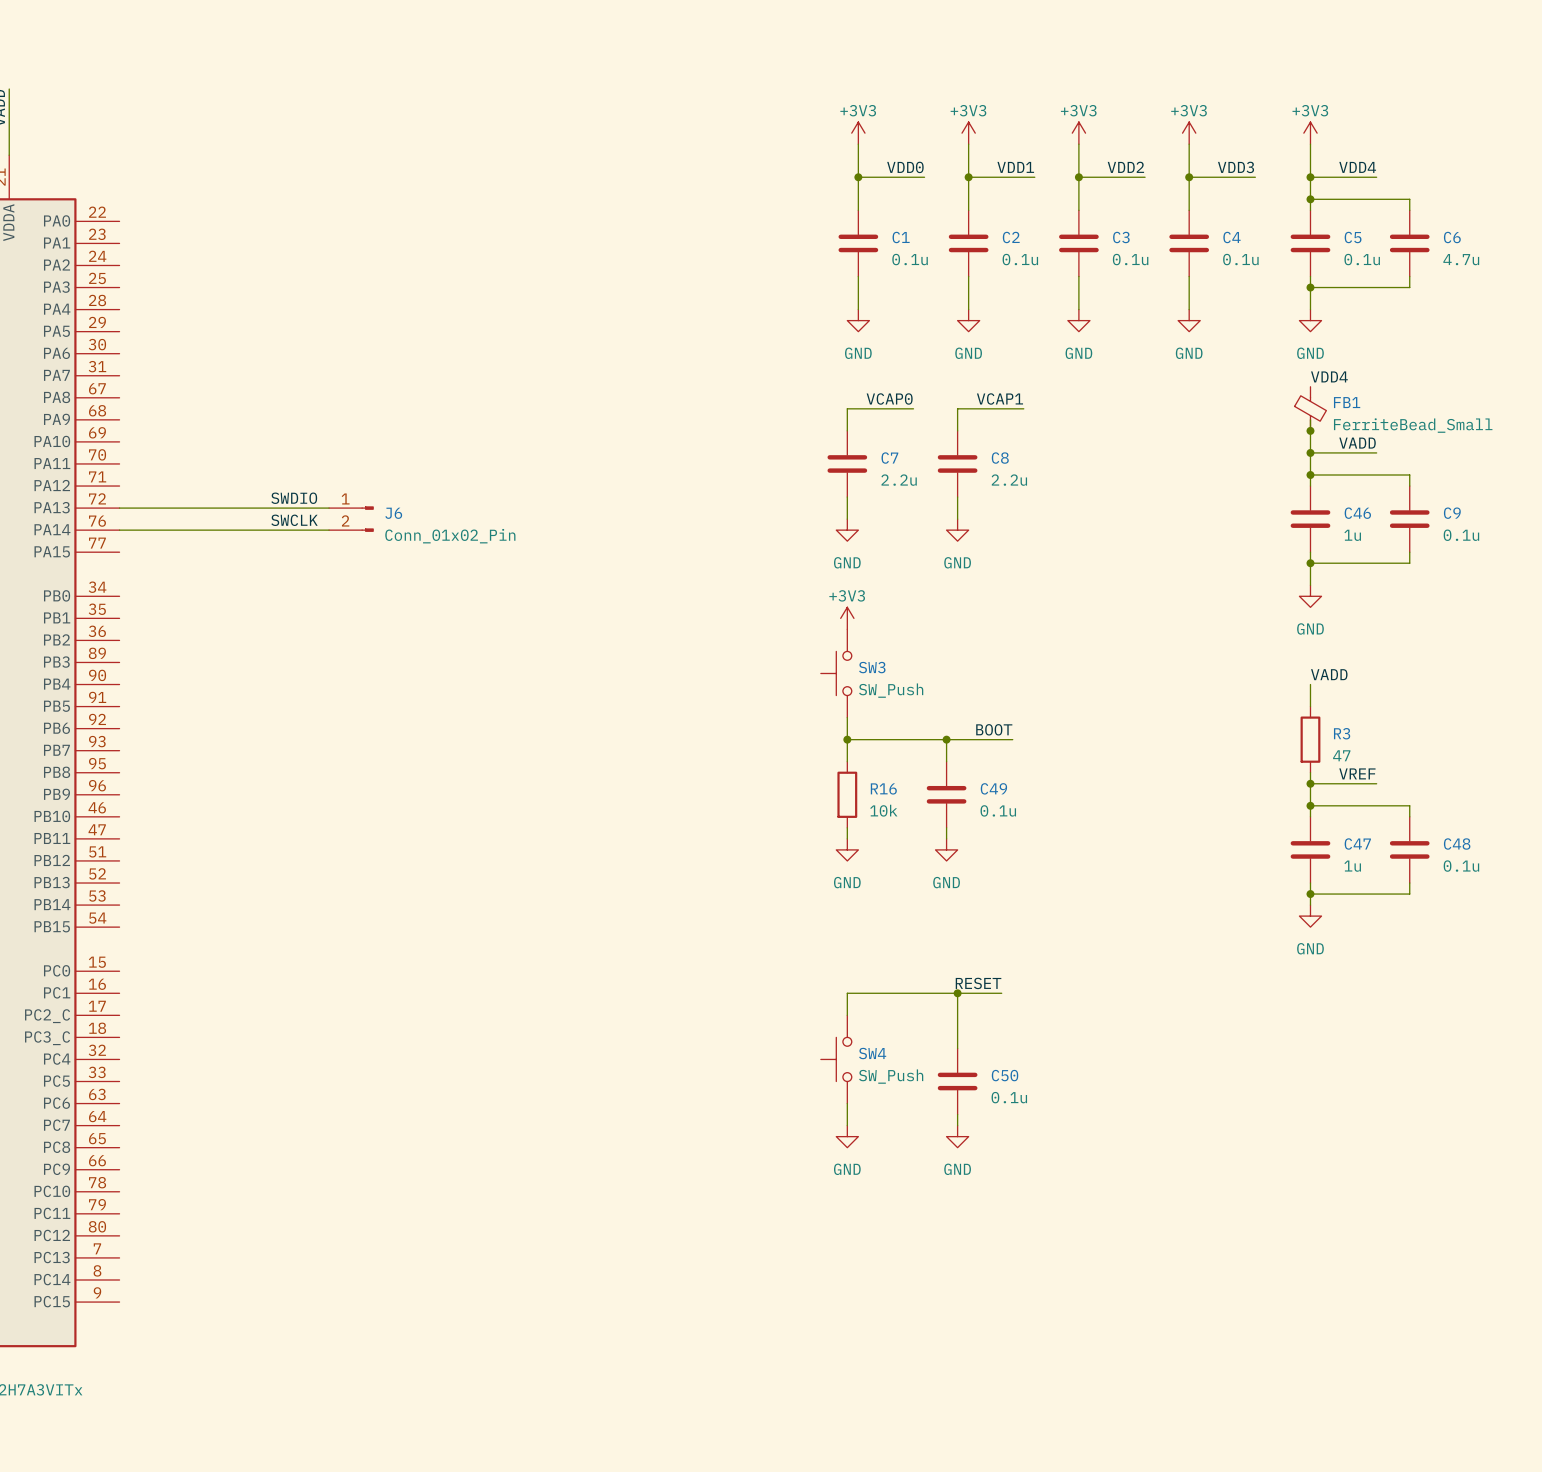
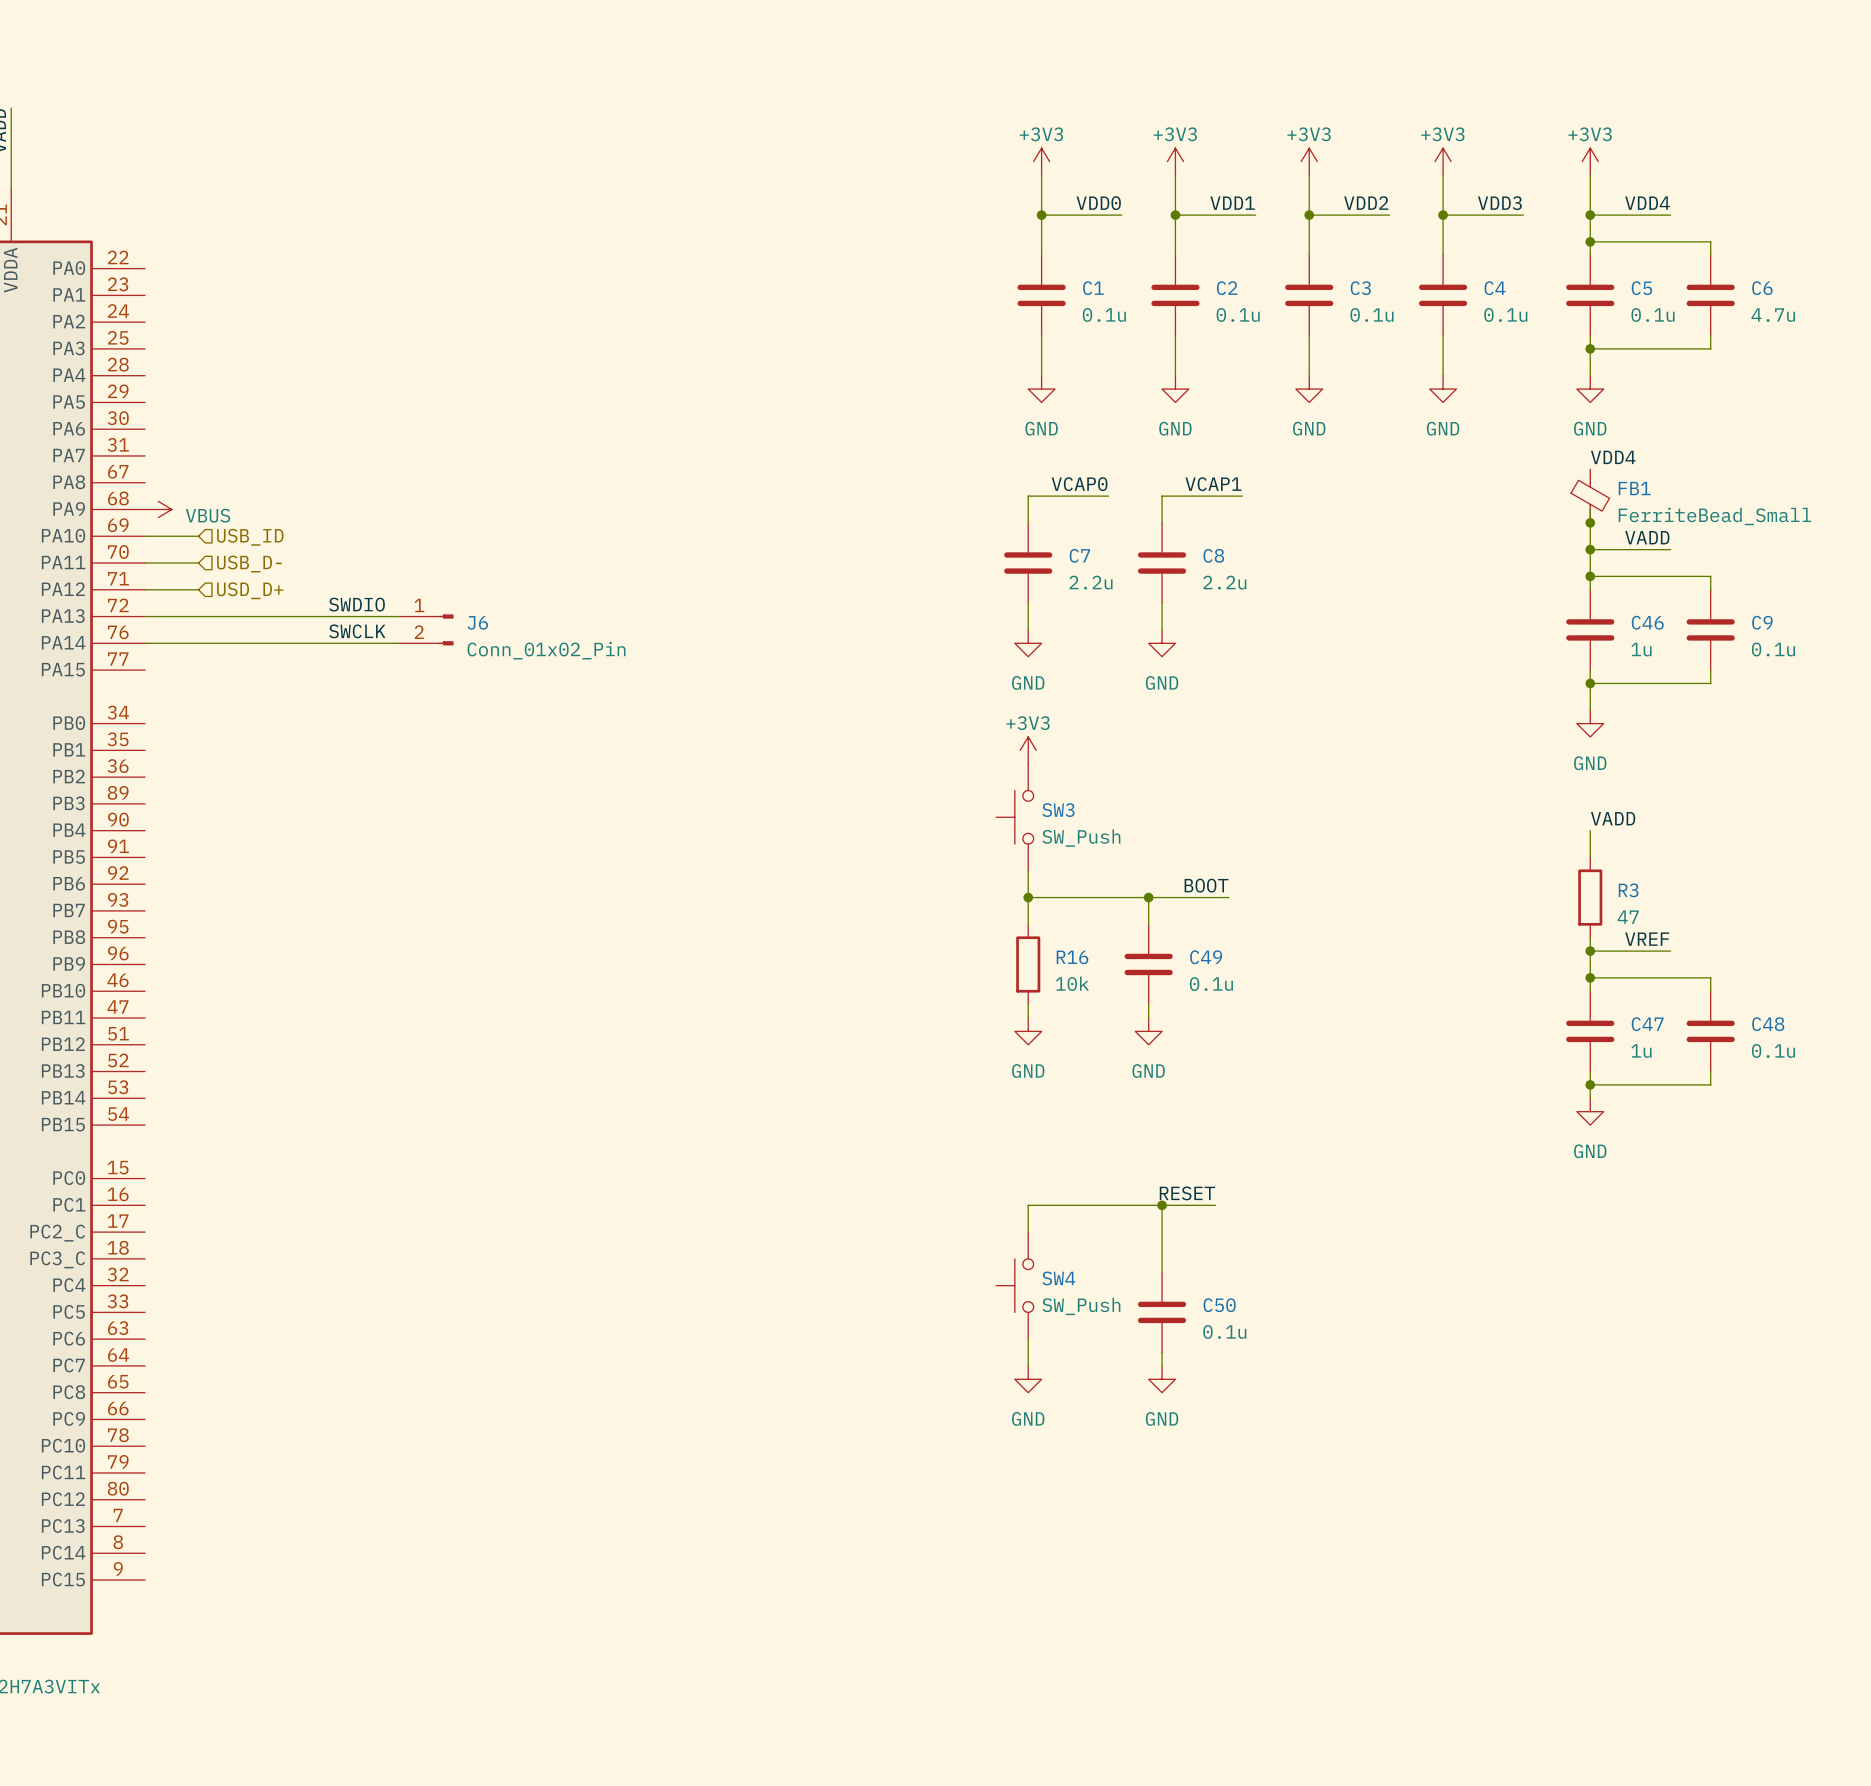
power symbol: none -> VBUS (158, 509)
wire: none -> (145, 536) (198, 536)
hierarchical label: none -> USB_ID (250, 537)
wire: none -> (145, 563) (198, 563)
hierarchical label: none -> USB_D- (249, 564)
wire: none -> (145, 589) (198, 589)
hierarchical label: none -> USD_D+ (250, 590)

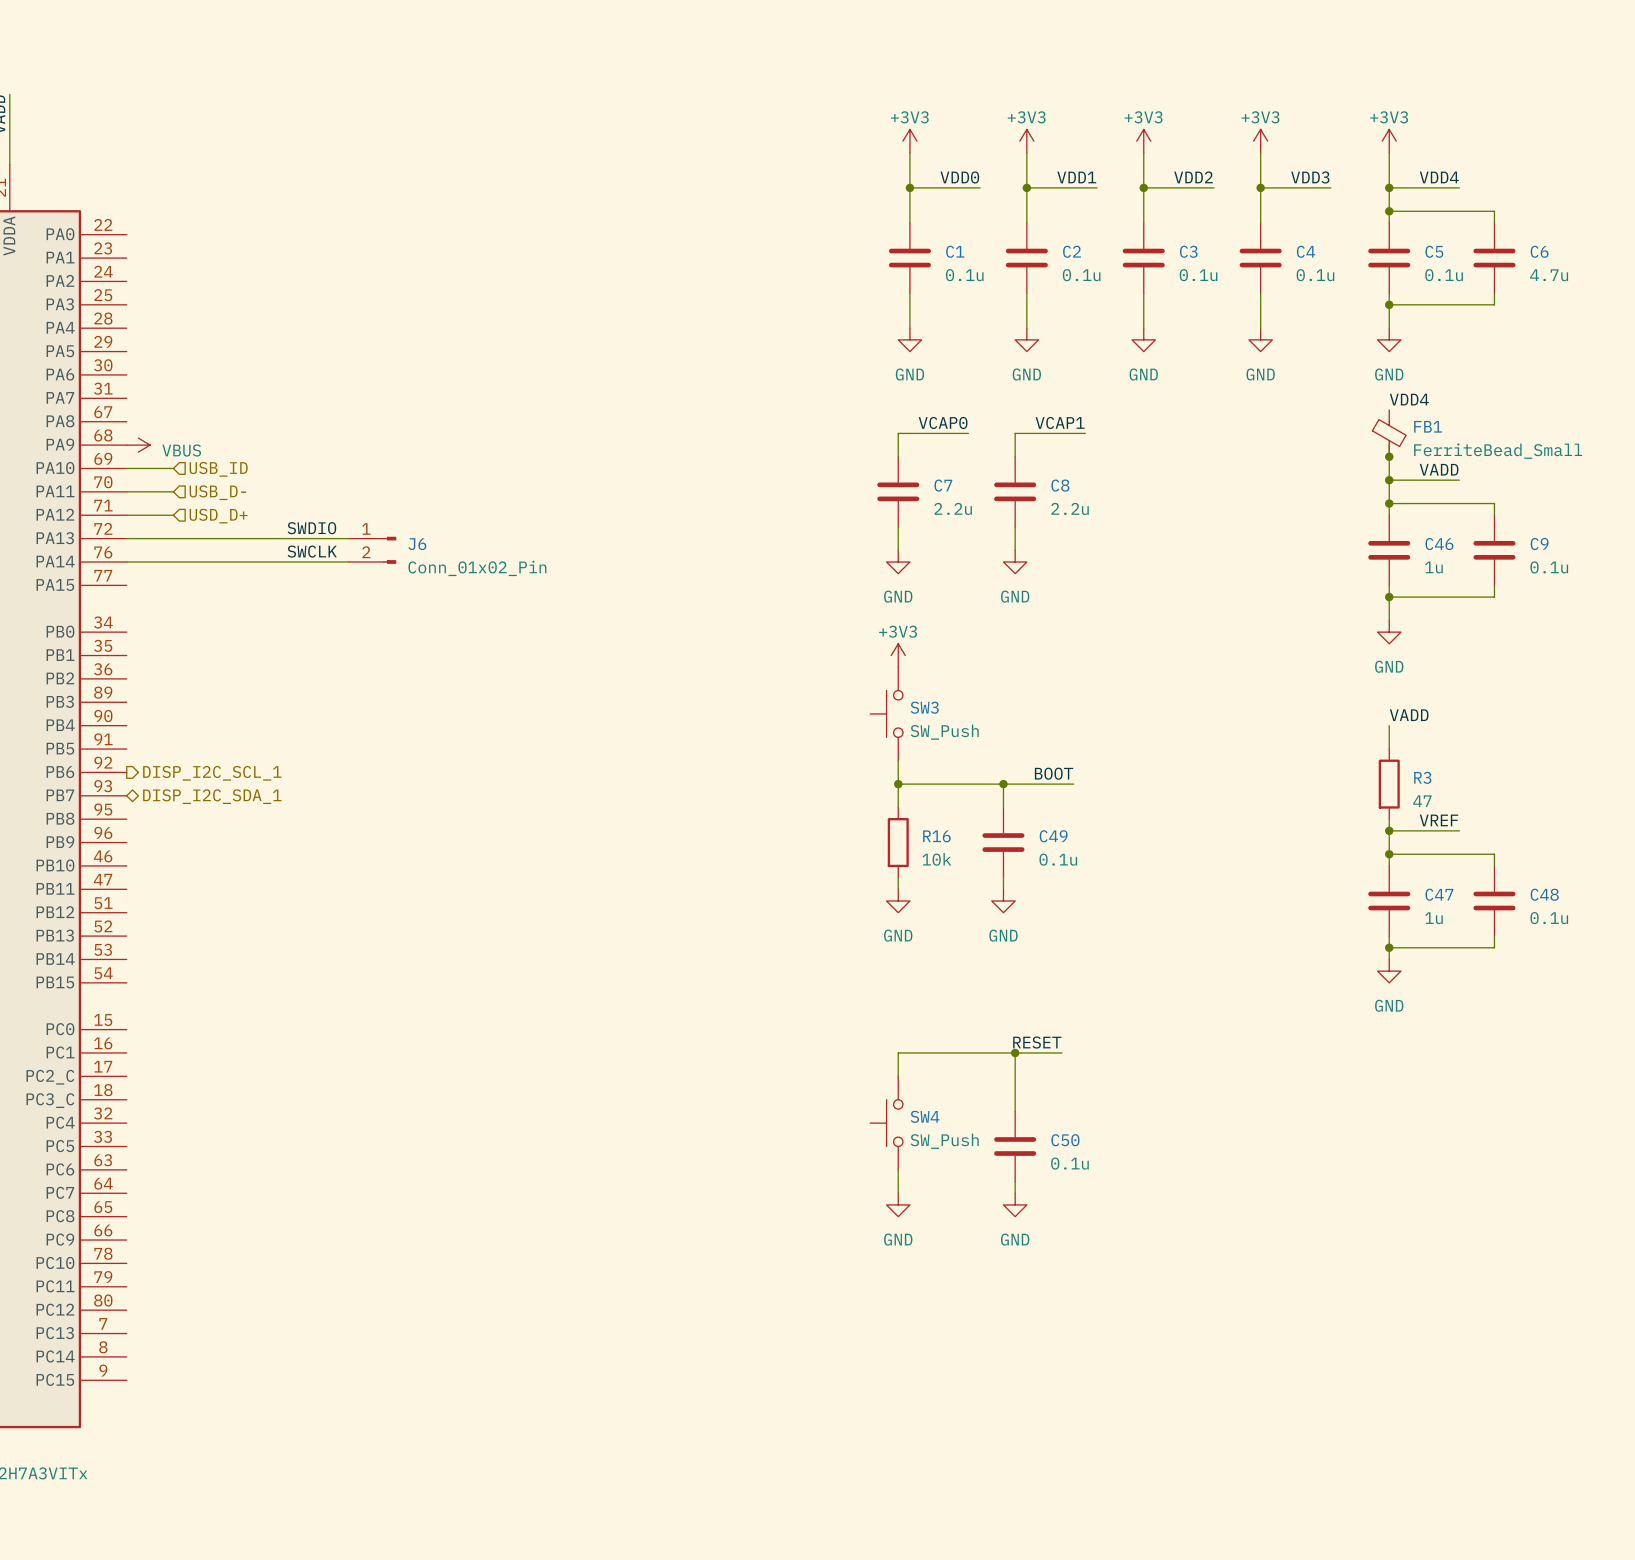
hierarchical label: none -> DISP_I2C_SCL_1 (212, 773)
hierarchical label: none -> DISP_I2C_SDA_1 (212, 796)

